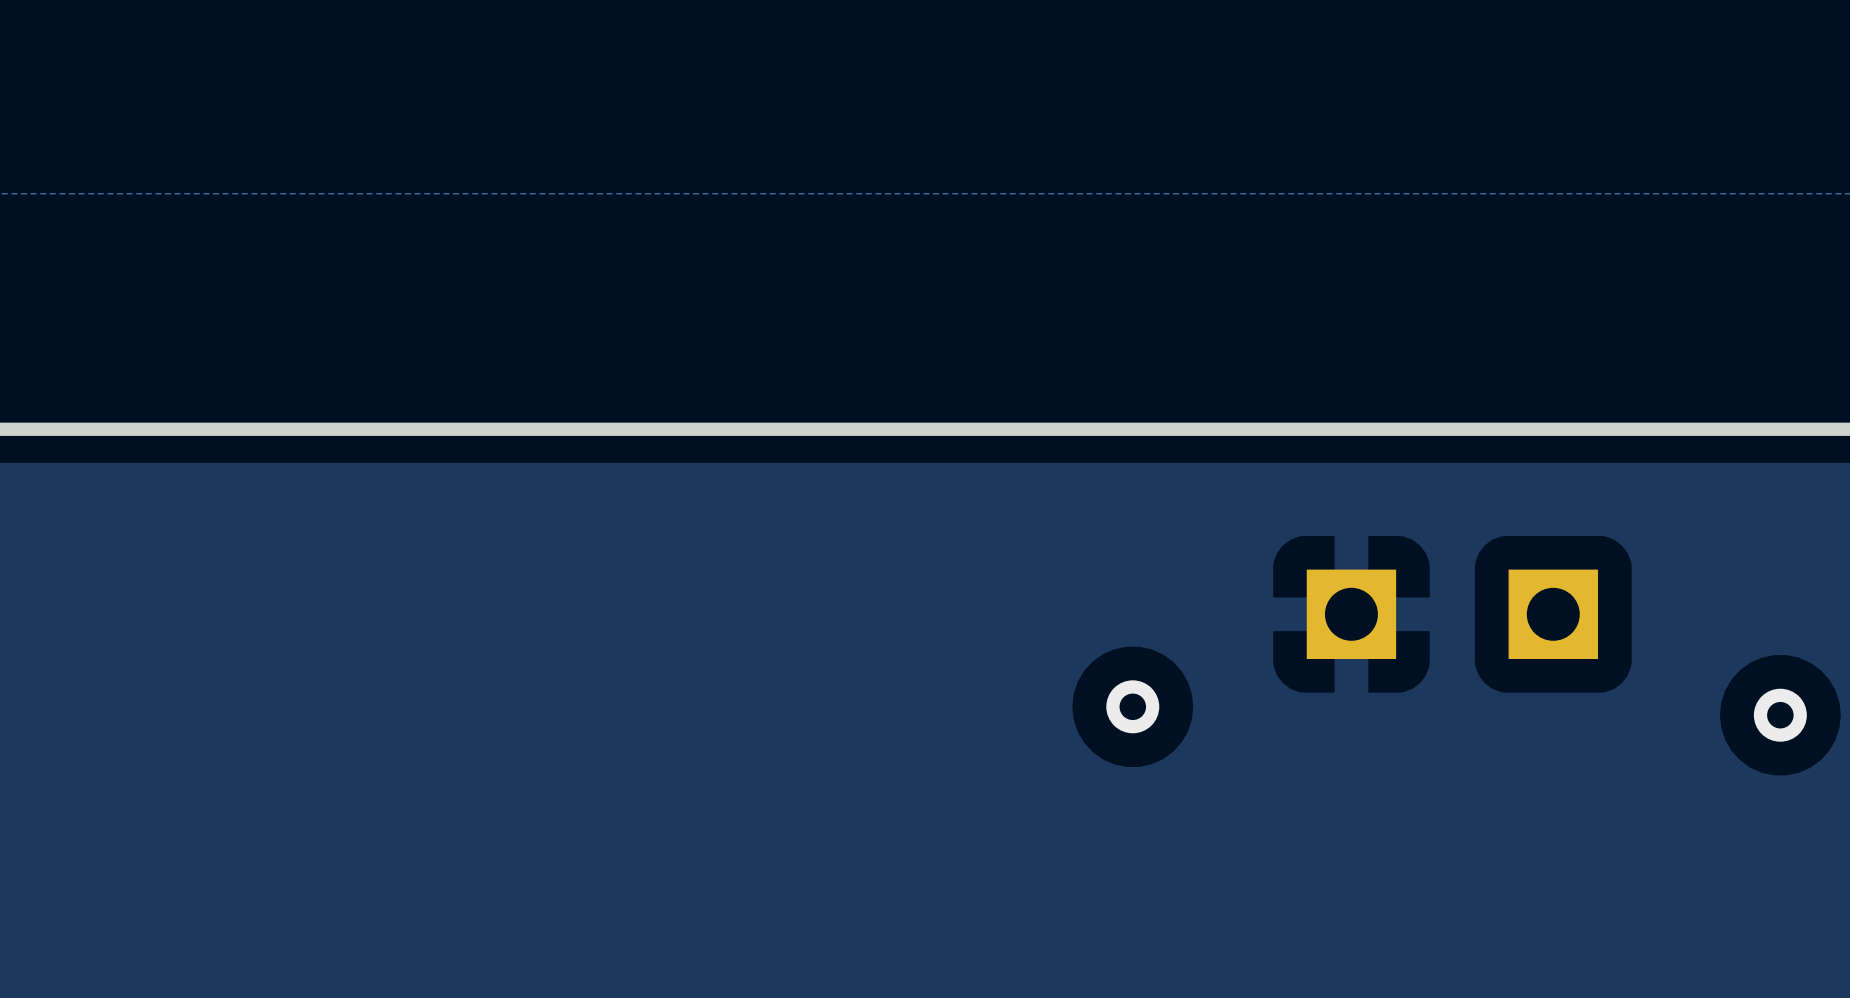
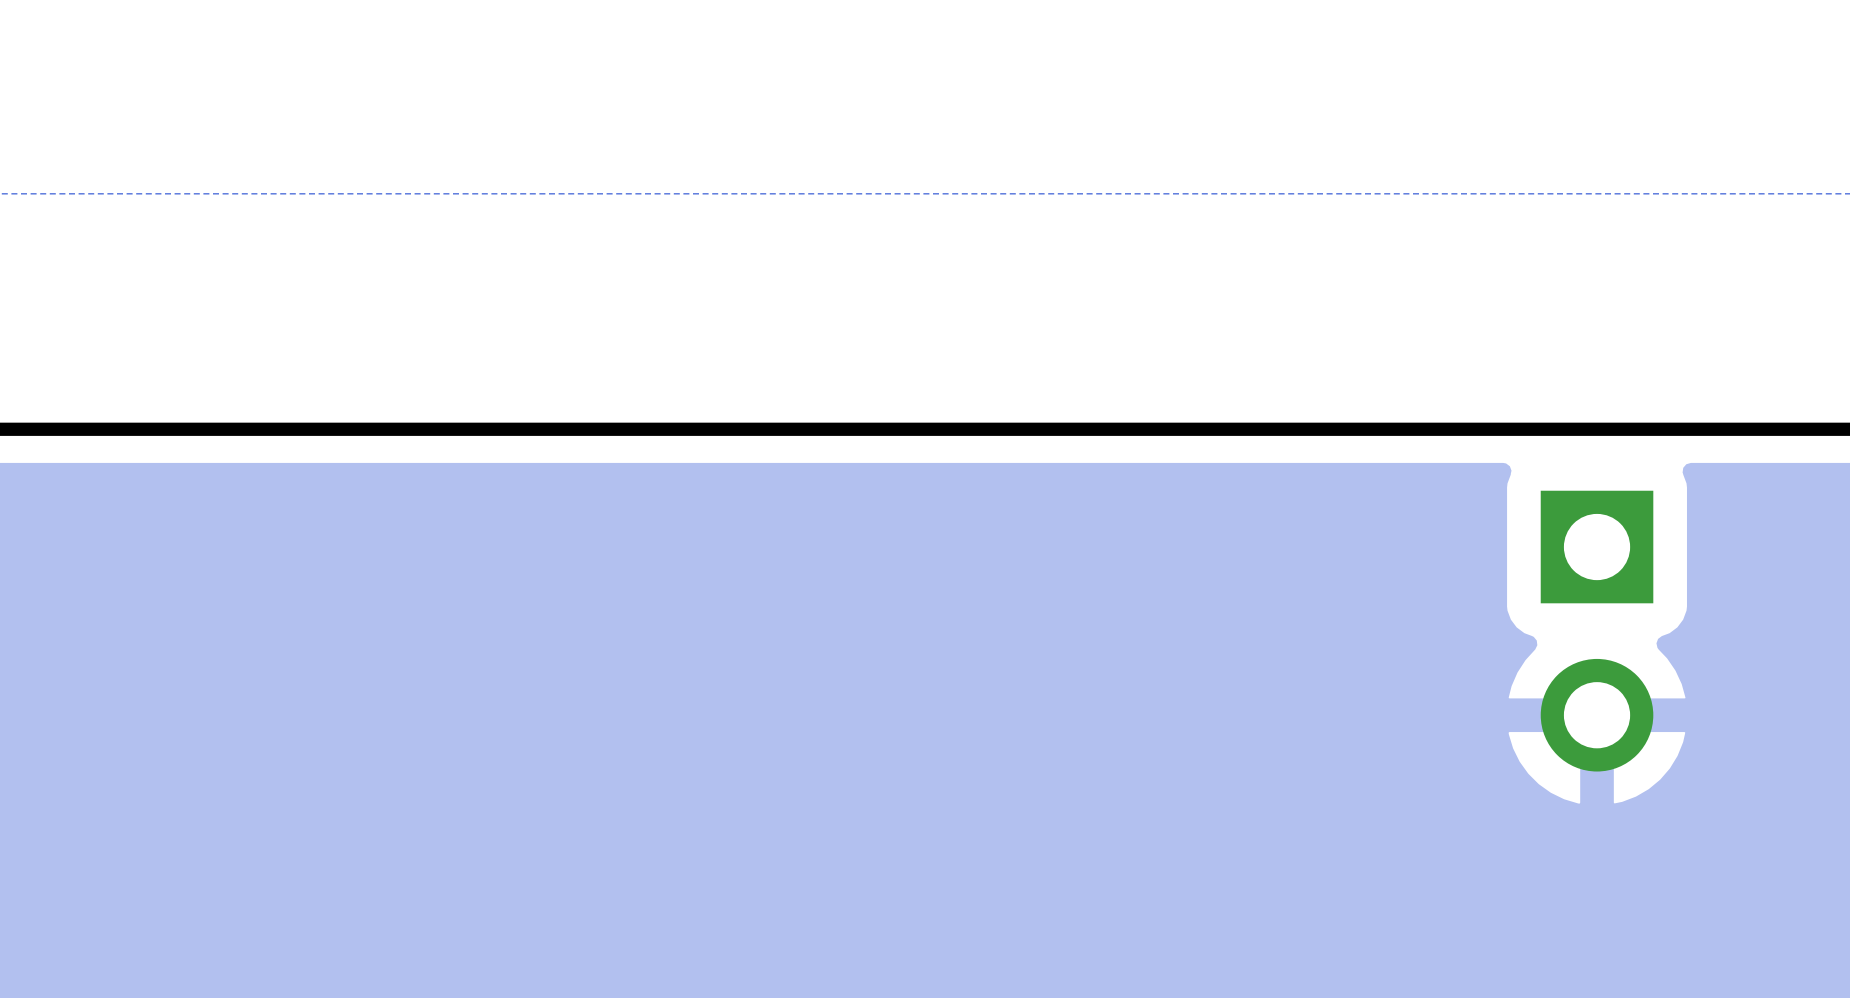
part footprint: [1508, 569, 1598, 660] -> [1540, 490, 1654, 772]
part: (1351, 614) -> none
via: (1132, 706) -> none
via: (1780, 715) -> none

